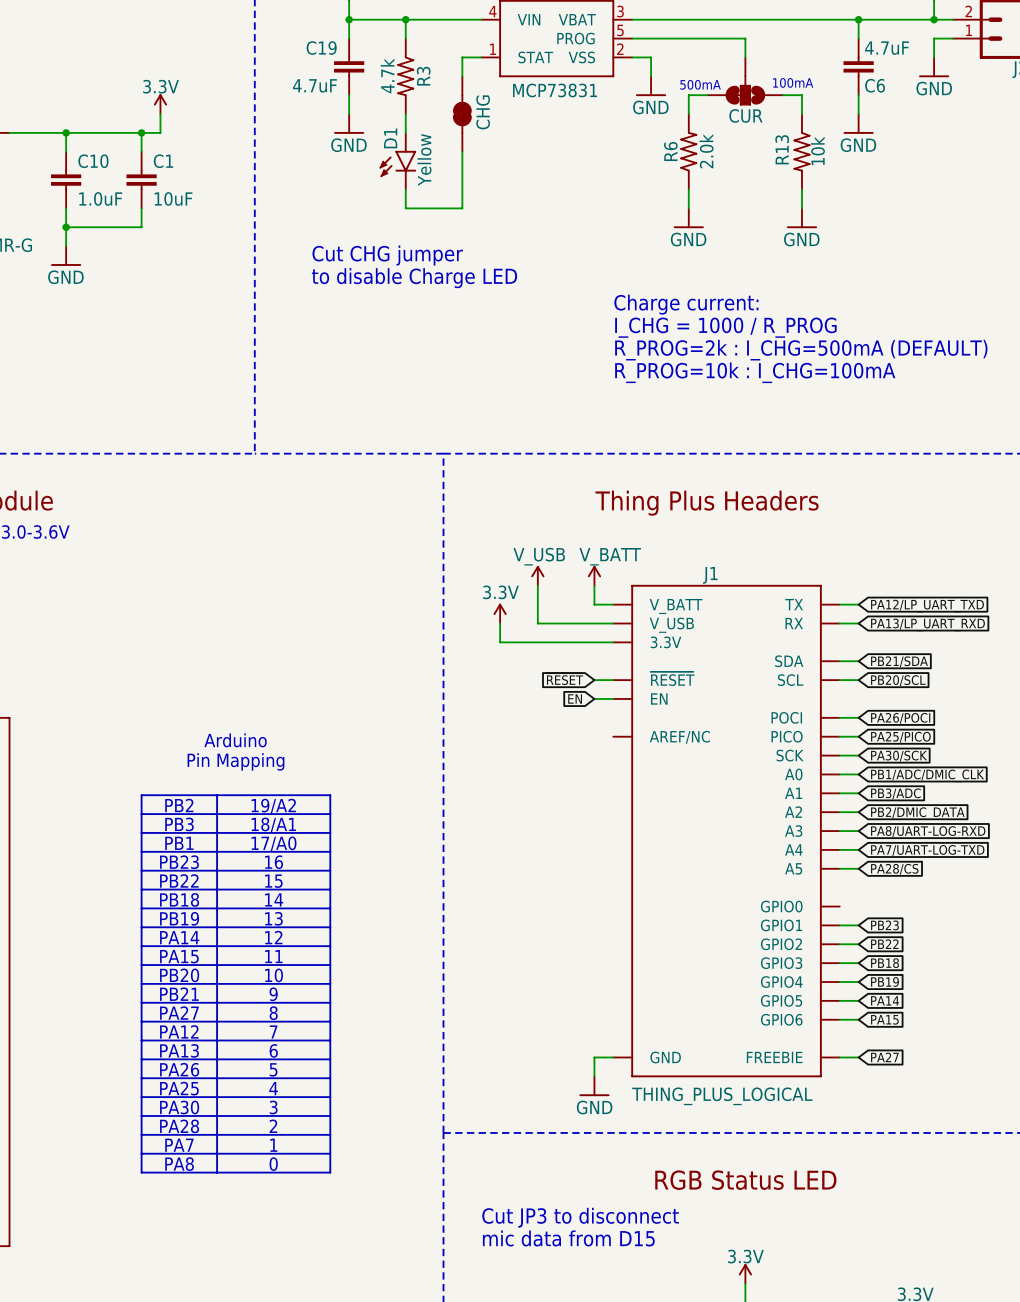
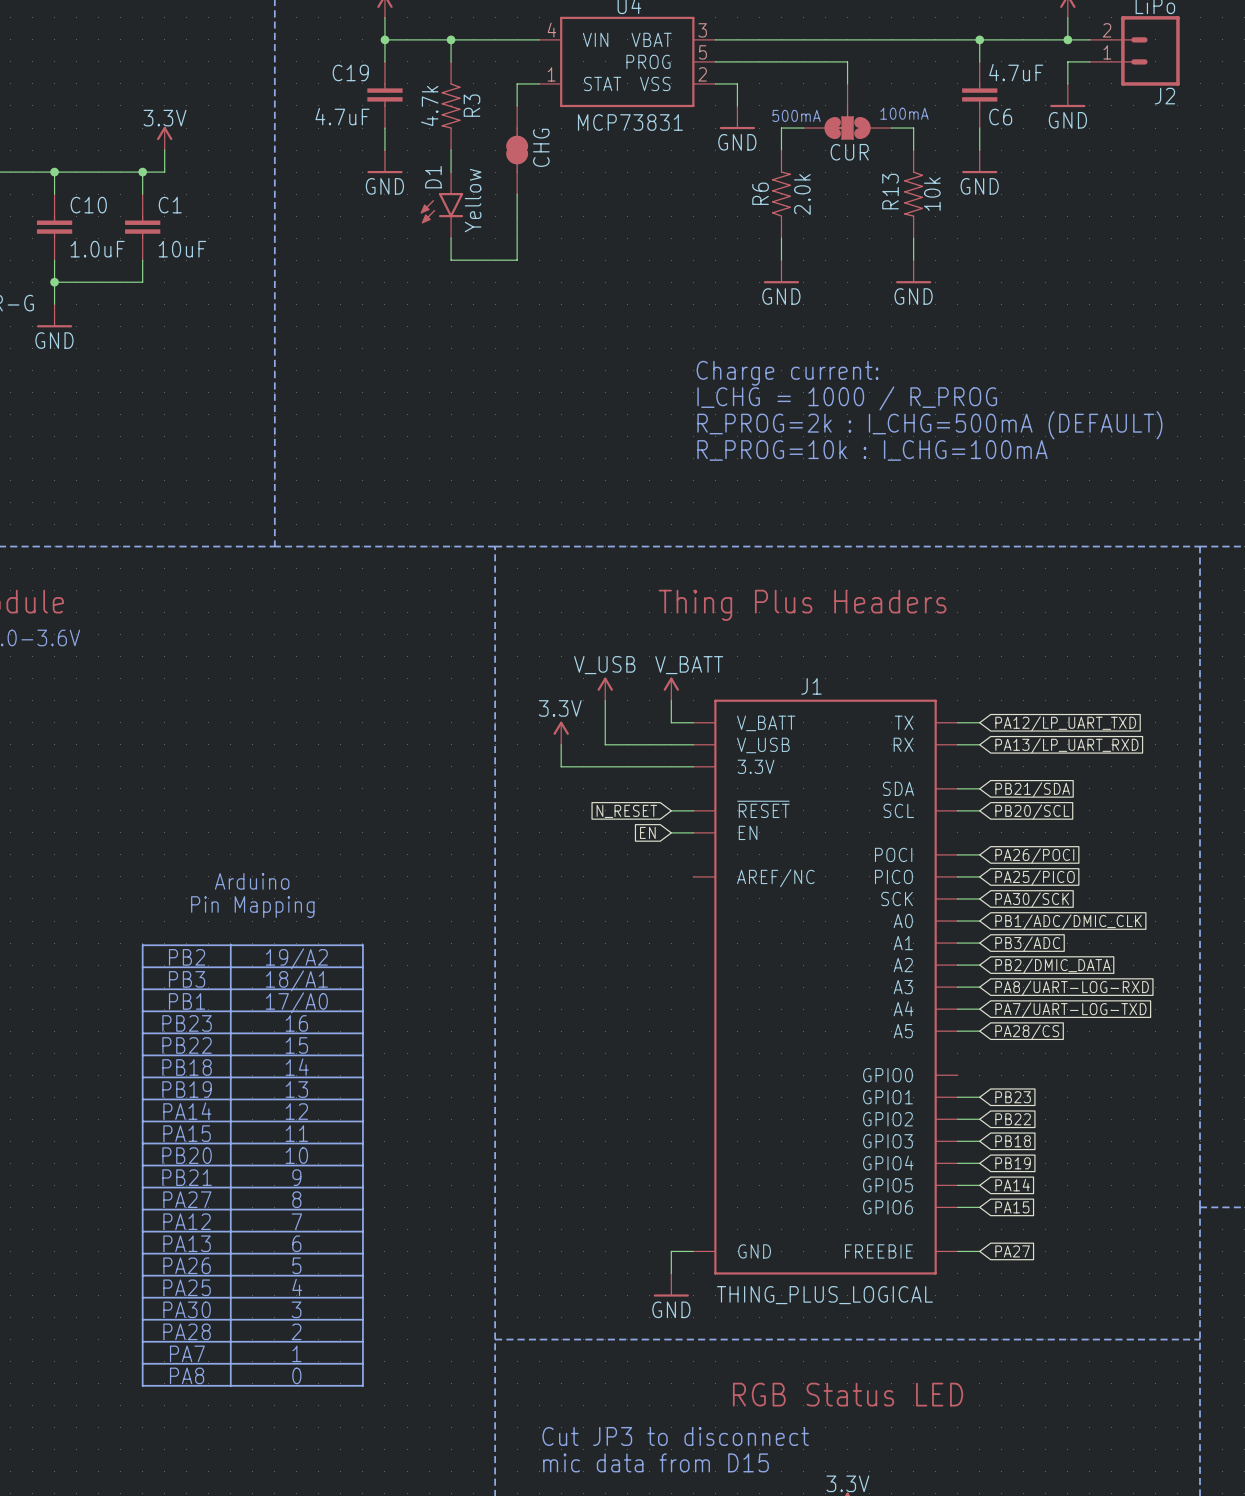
text: Cut CHG jumper (387, 255) -> none
text: to disable Charge LED (414, 278) -> none
global label: ~{RESET} (564, 679) -> N_RESET (626, 811)

